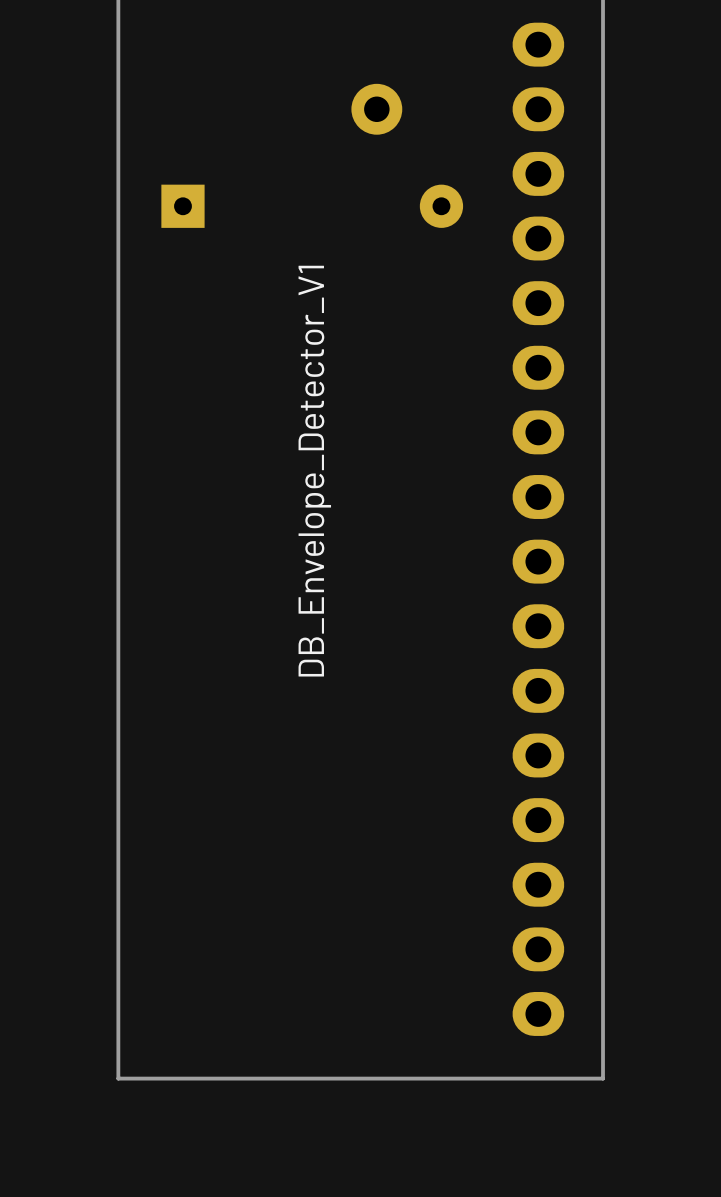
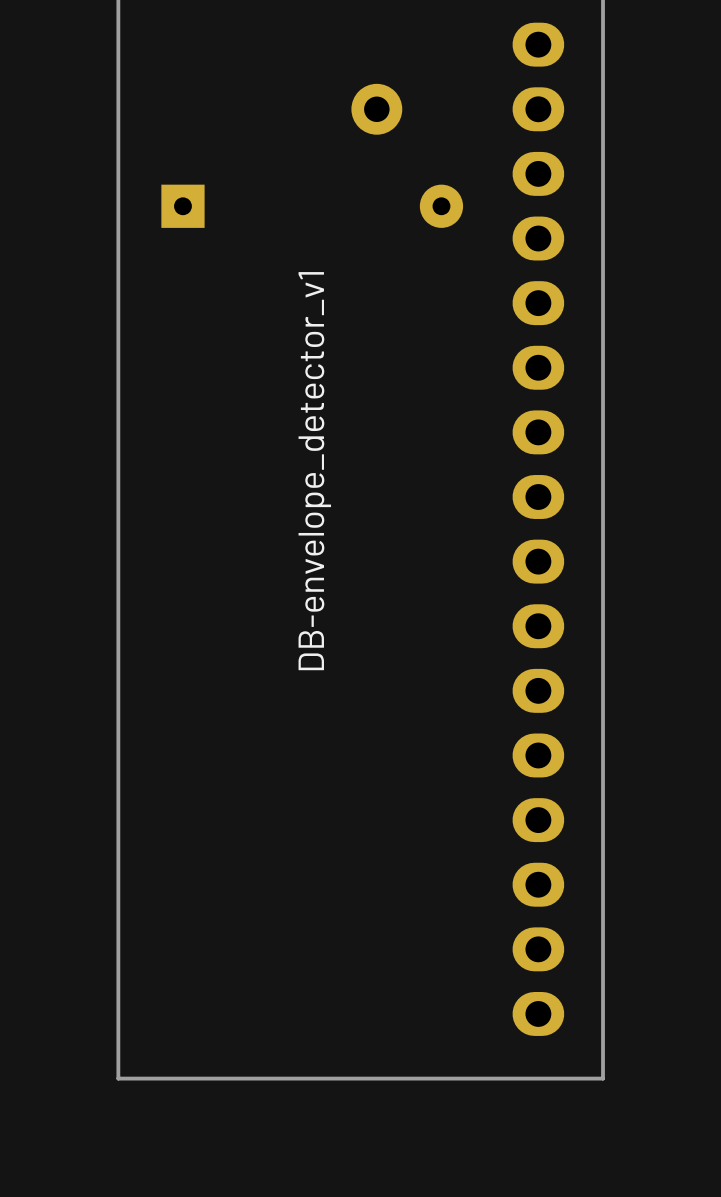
text: DB_Envelope_Detector_V1 (314, 471) -> DB-envelope_detector_v1 (314, 471)

